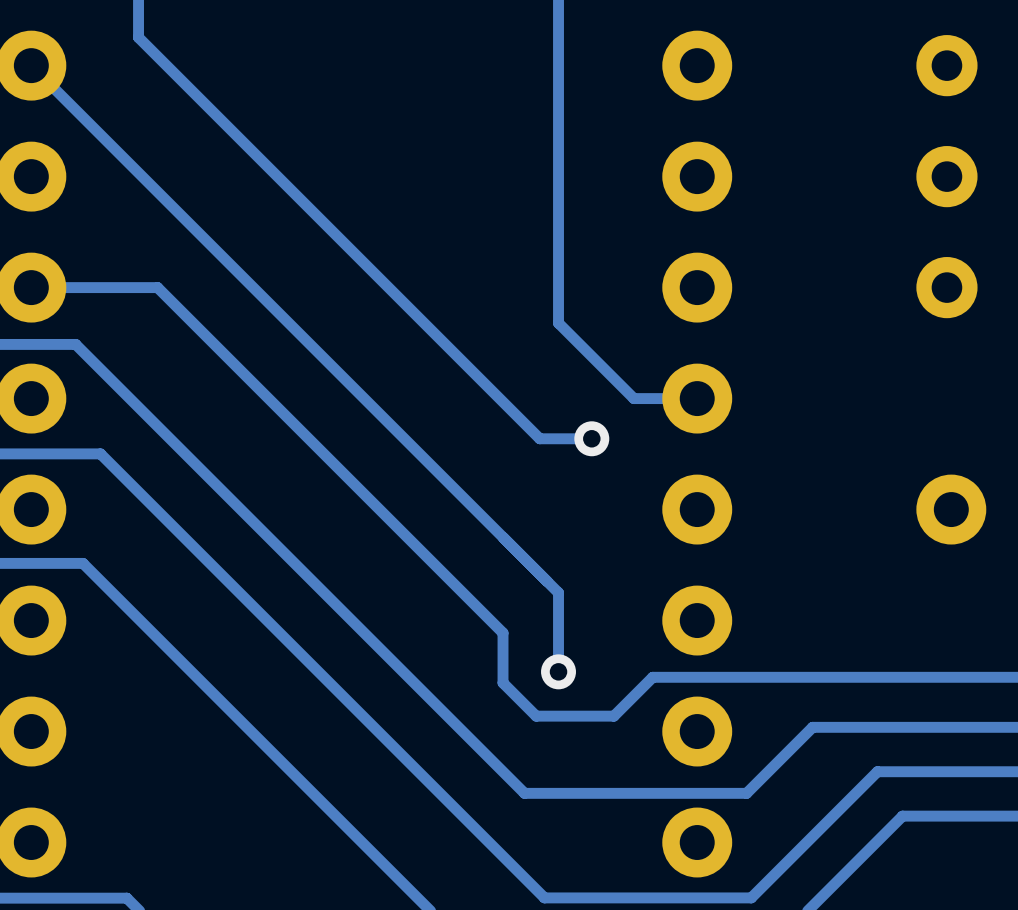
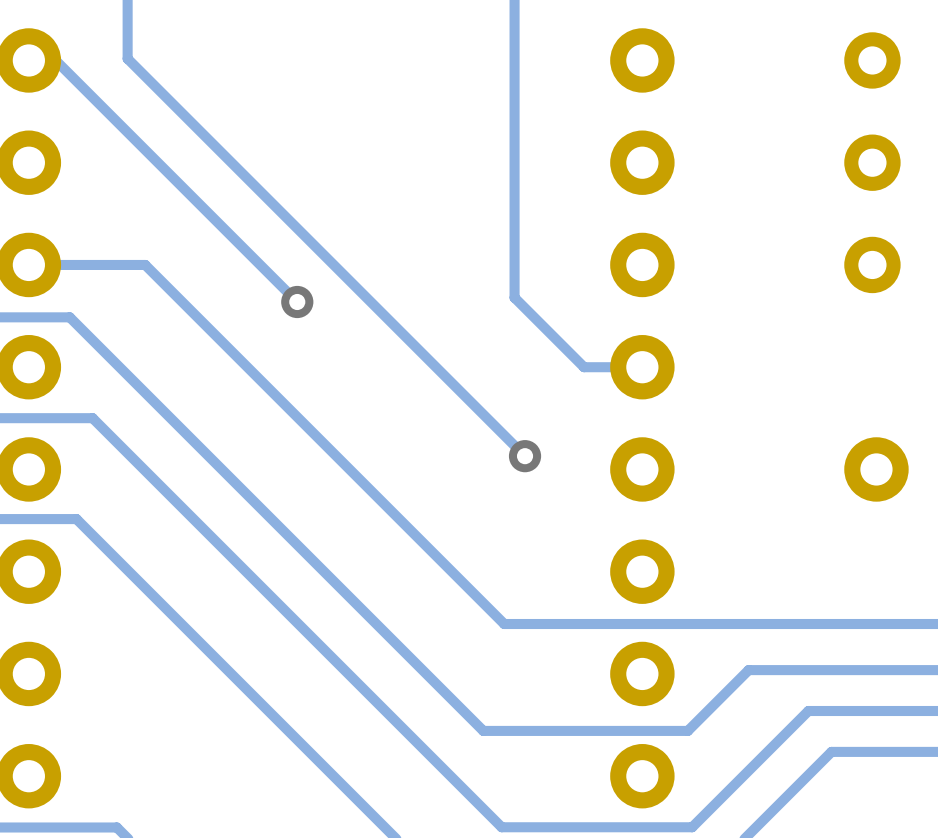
track: (138, 37) (539, 438) (591, 438) -> (127, 34) (127, 58) (525, 456)
track: (31, 65) (558, 592) (558, 671) -> (28, 60) (55, 60) (297, 302)
via: none -> (297, 302)
via position: (591, 438) -> (525, 456)
track: (503, 633) (503, 682) (536, 716) (613, 716) (652, 677) -> (463, 583) (504, 624) (601, 624)
via: (558, 671) -> none

